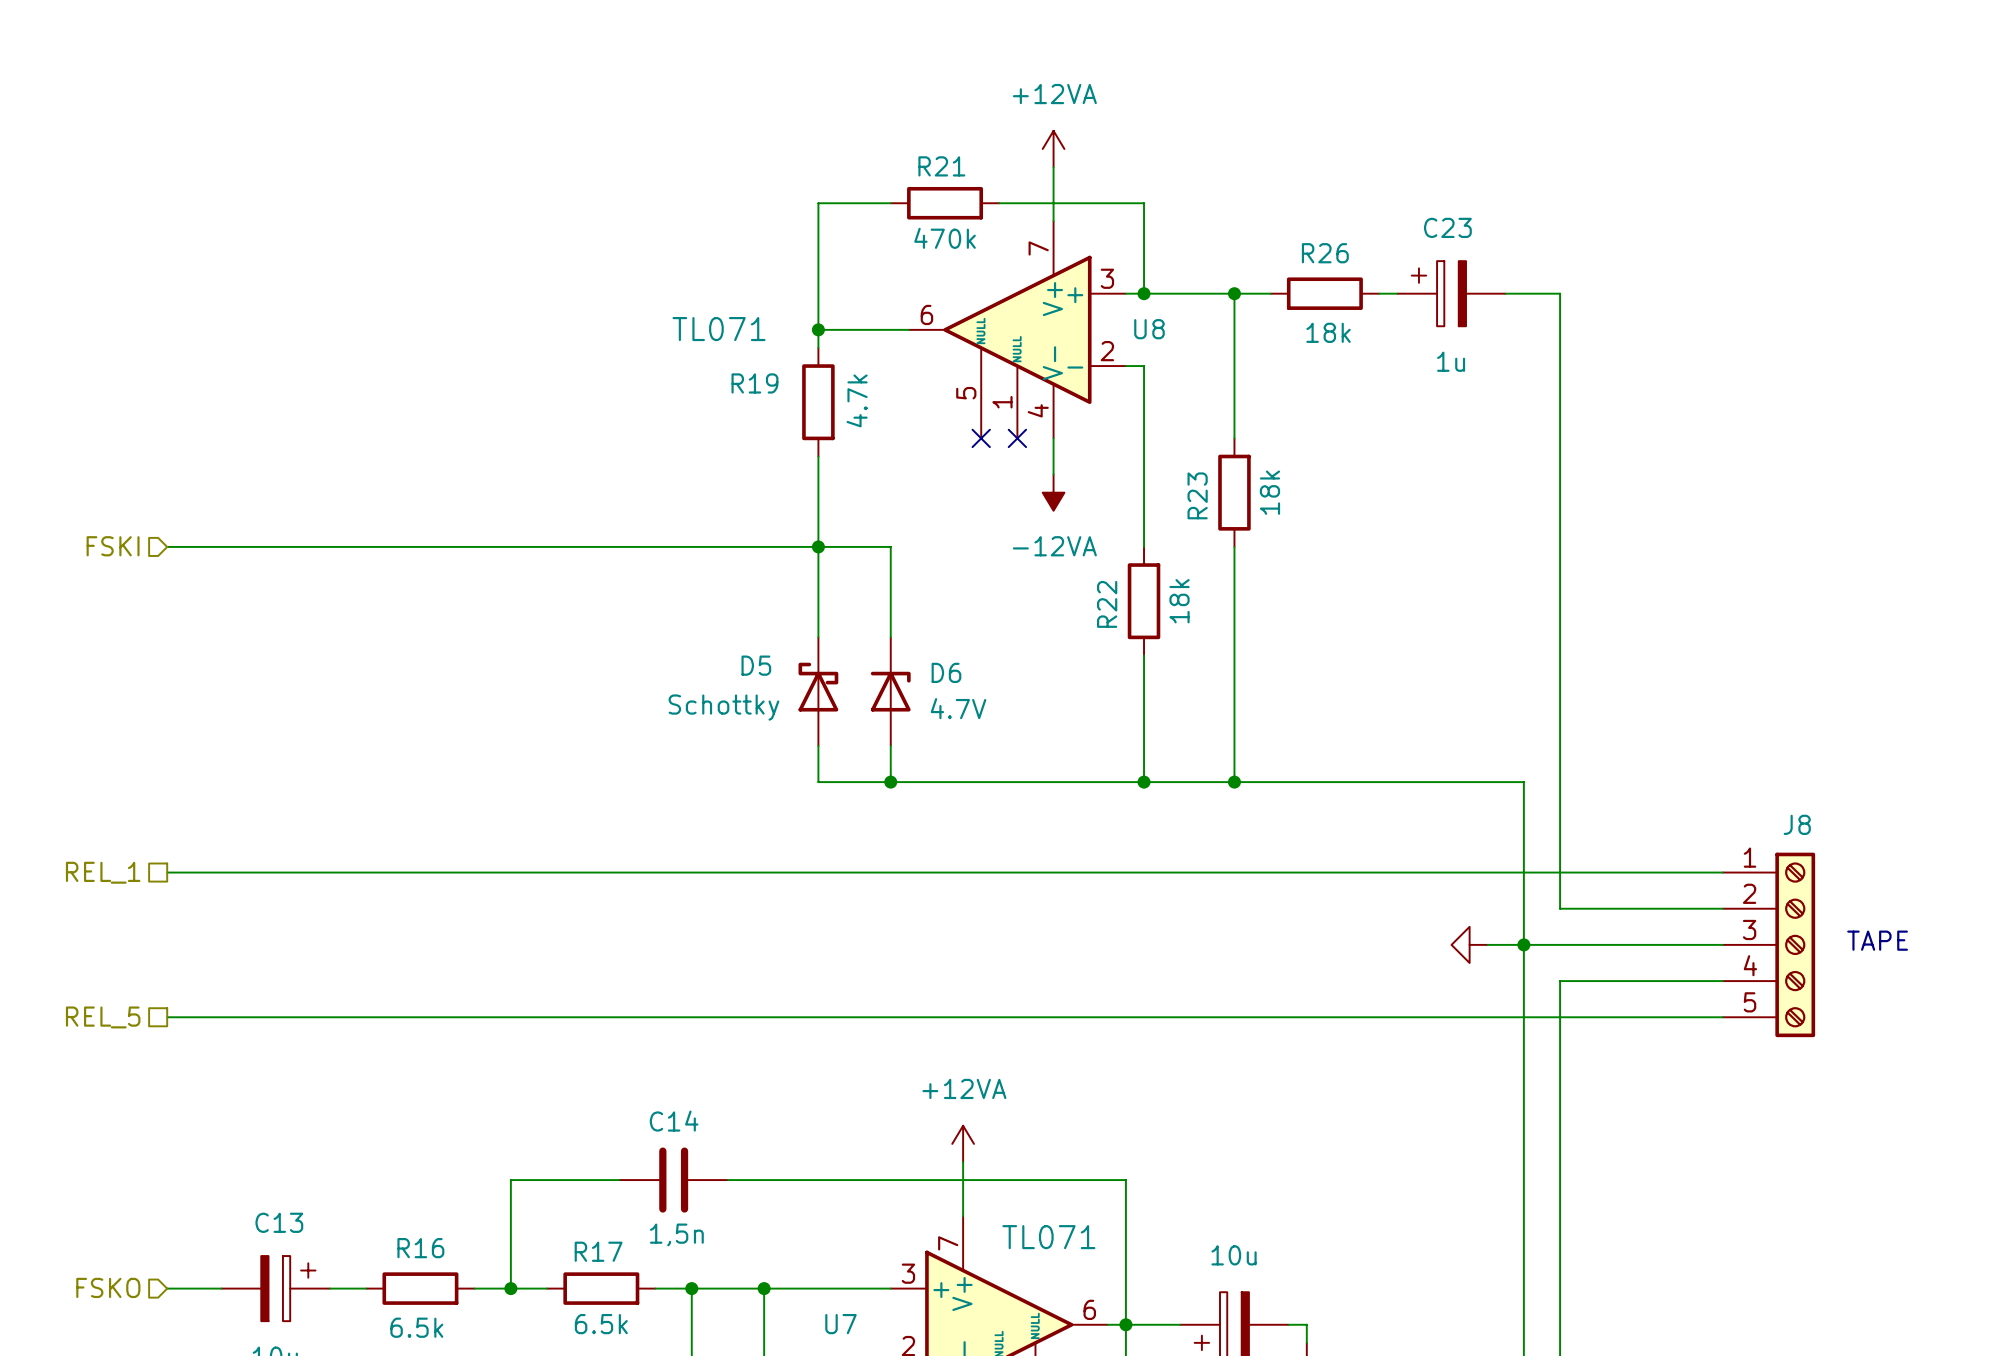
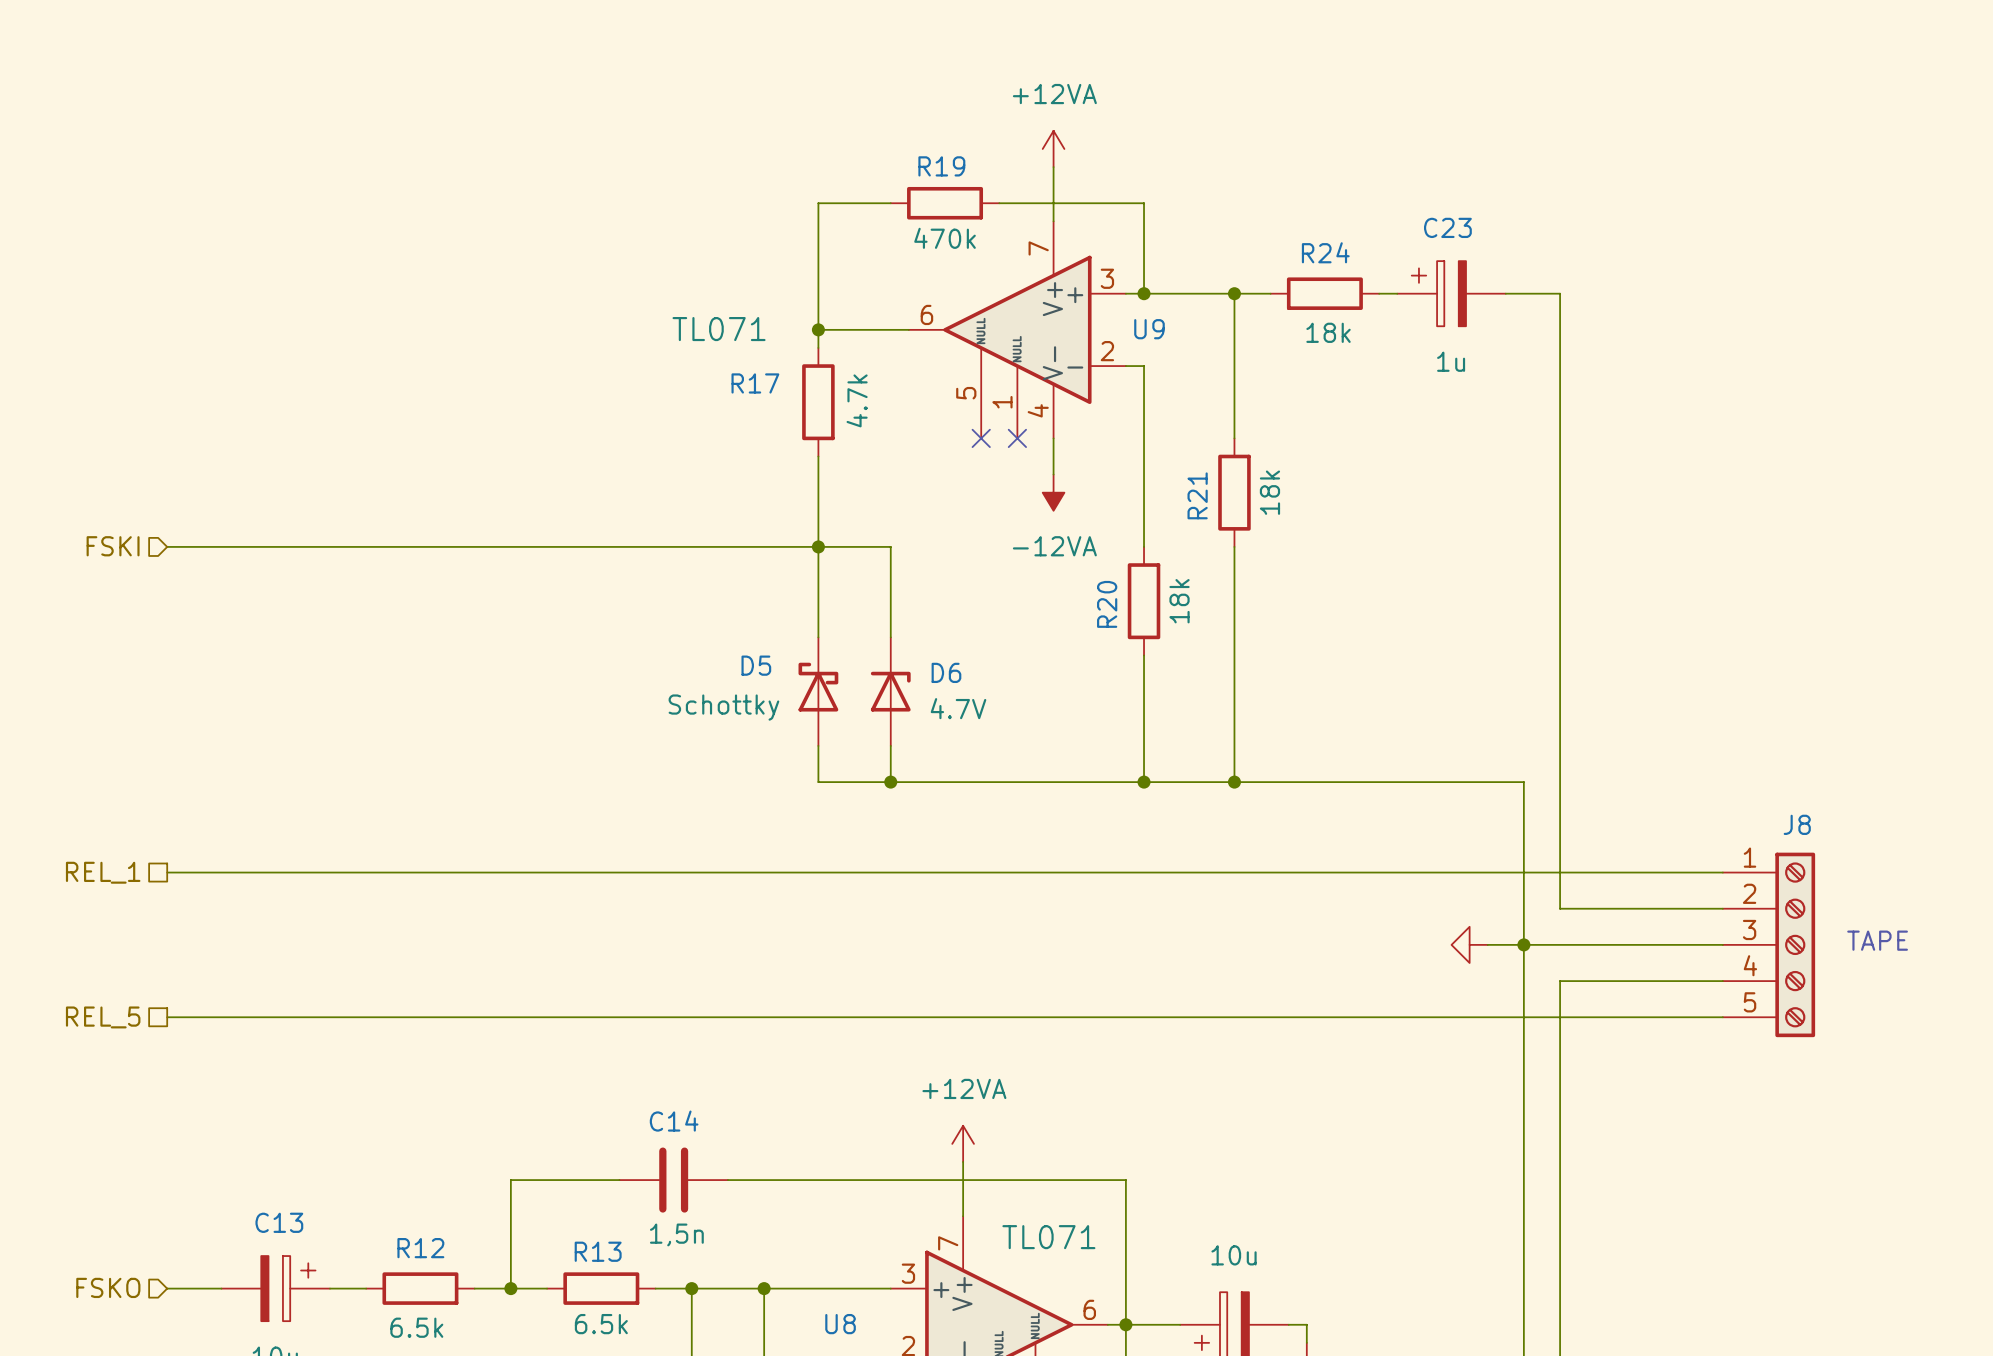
R21 name: R21 (941, 166) -> R19 (941, 166)
R26 name: R26 (1325, 253) -> R24 (1325, 252)
U8 name: U8 (1149, 329) -> U9 (1149, 329)
R19 name: R19 (754, 383) -> R17 (755, 383)
R23 name: R23 (1197, 495) -> R21 (1197, 495)
R22 name: R22 (1107, 604) -> R20 (1107, 604)
R16 name: R16 (420, 1248) -> R12 (420, 1248)
R17 name: R17 (598, 1251) -> R13 (598, 1251)
U7 name: U7 (840, 1324) -> U8 (840, 1324)

